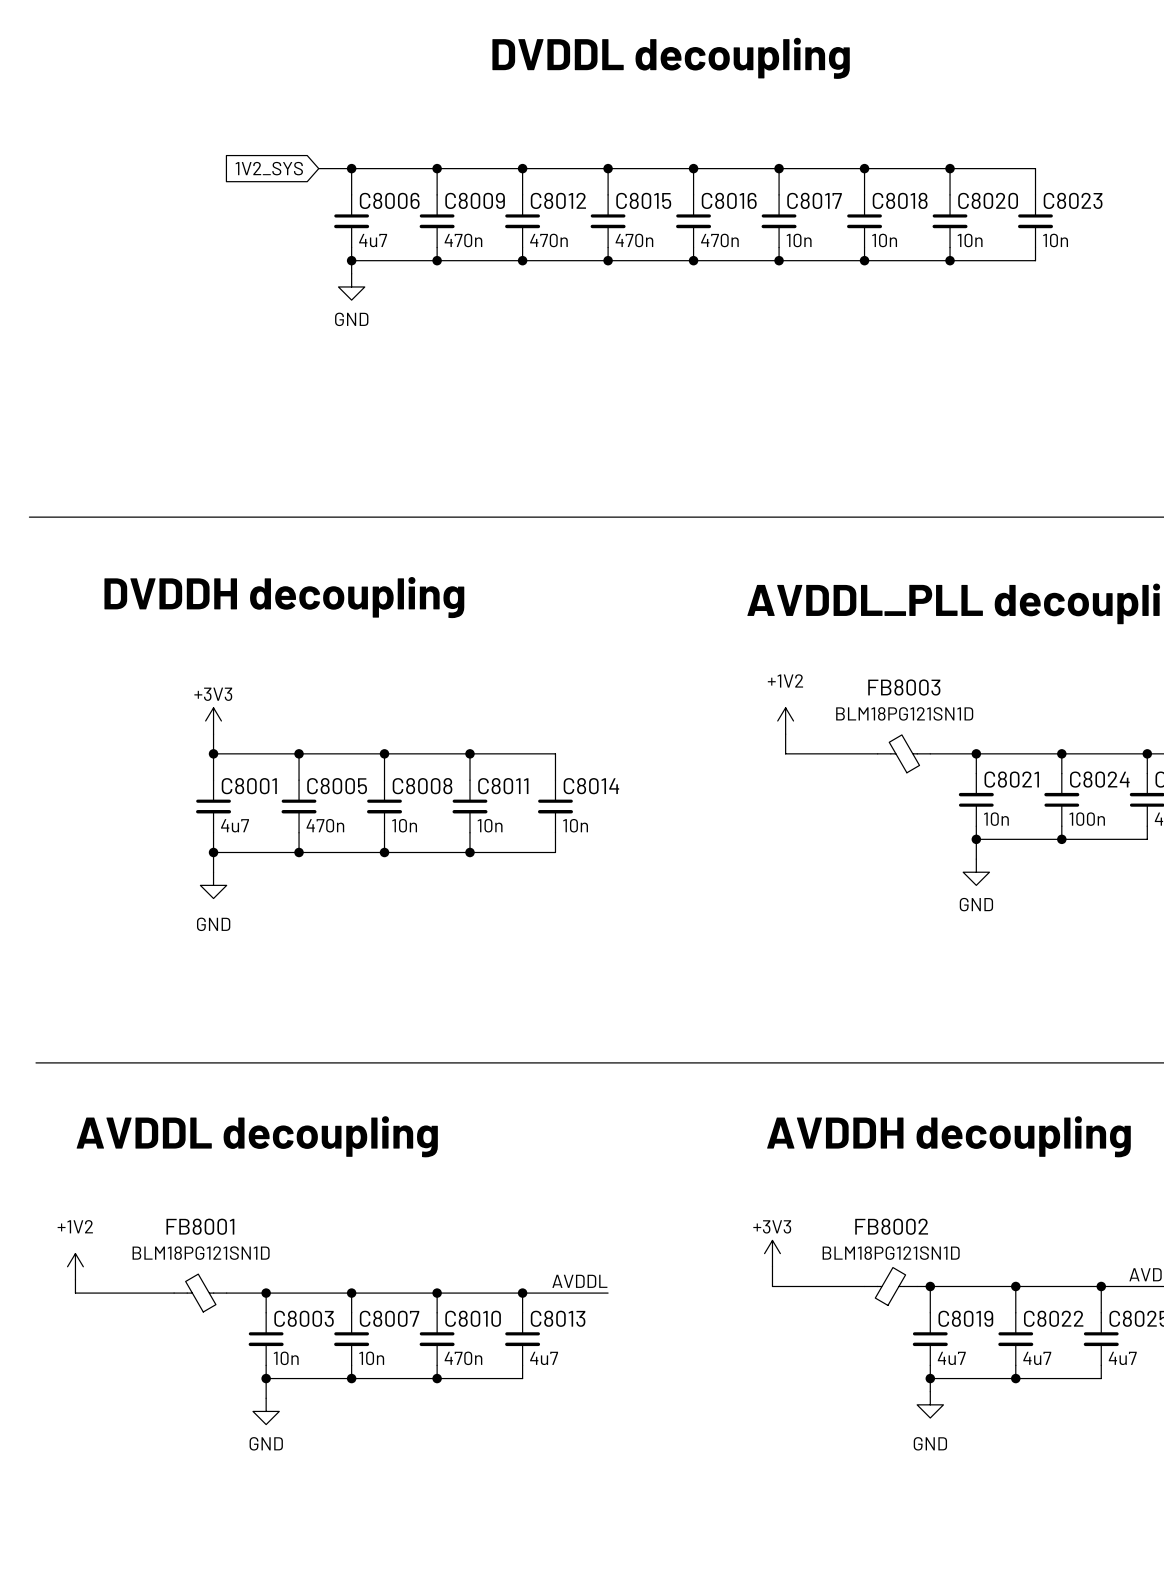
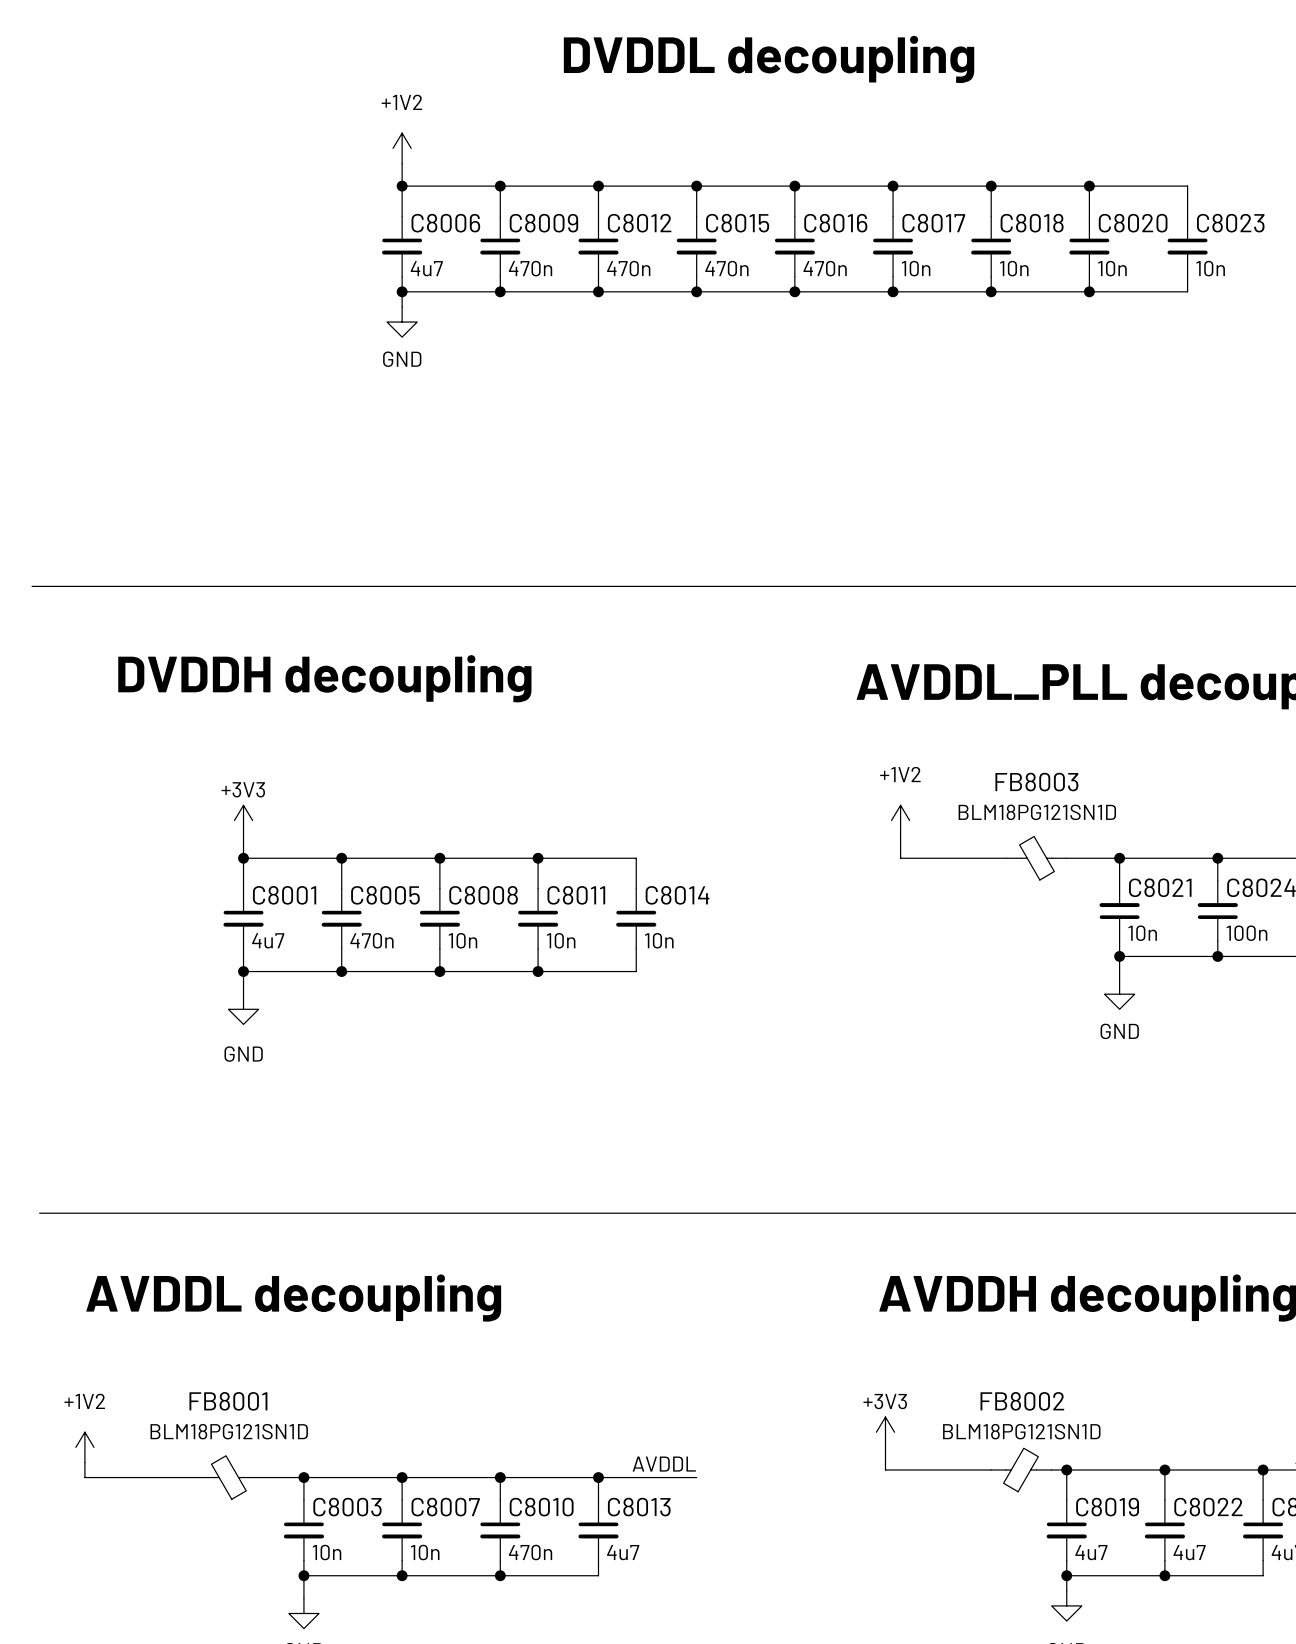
power symbol: none -> +1V2 (402, 148)
global label: 1V2_SYS (269, 168) -> none
wire: (318, 168) (351, 168) -> (402, 163) (402, 186)

